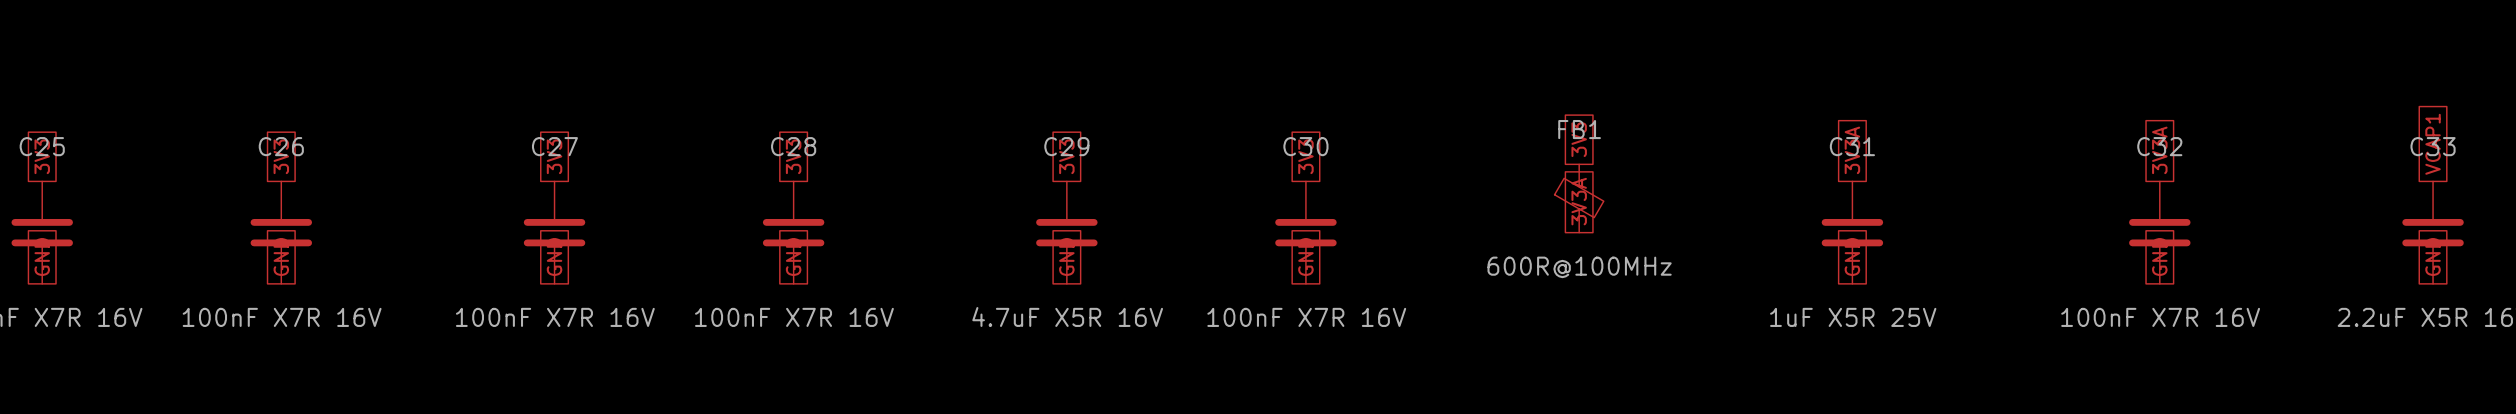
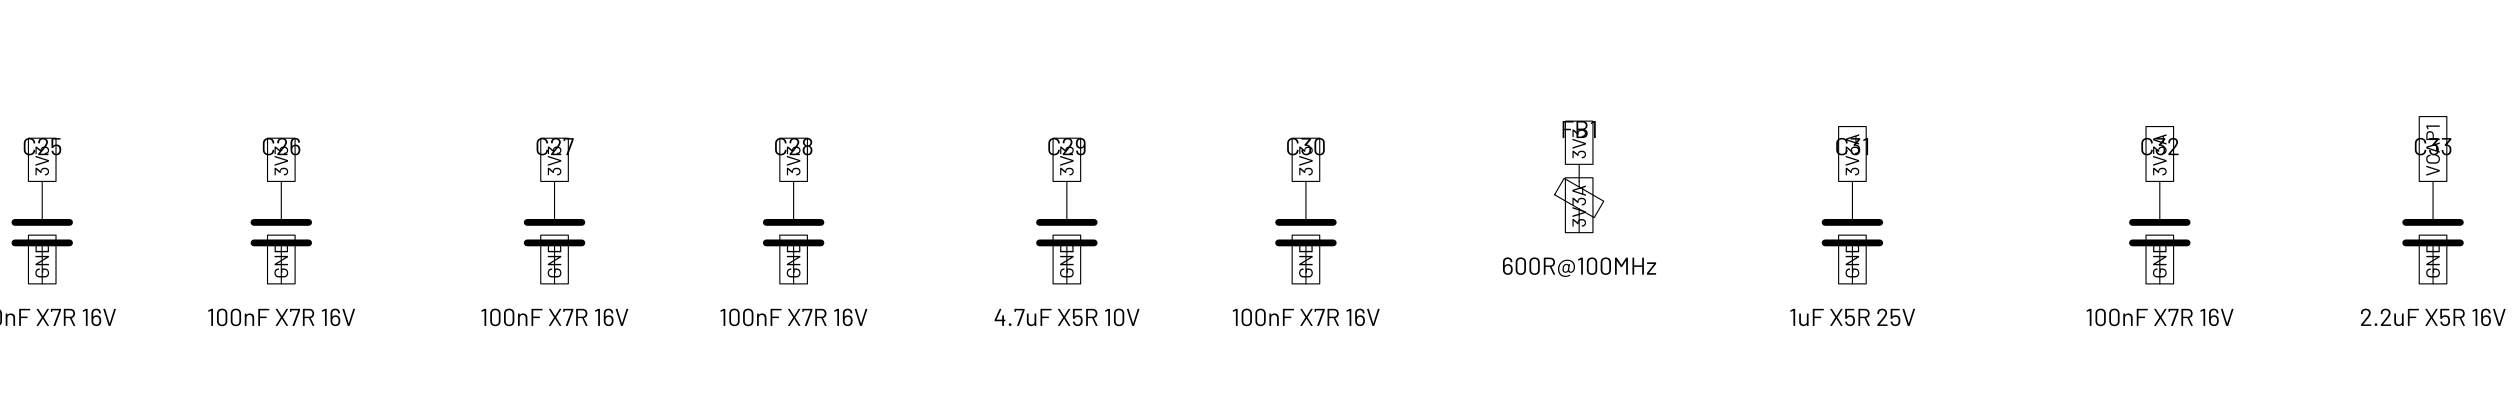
C29 value: 4.7uF X5R 16V (1067, 316) -> 4.7uF X5R 10V (1067, 317)

